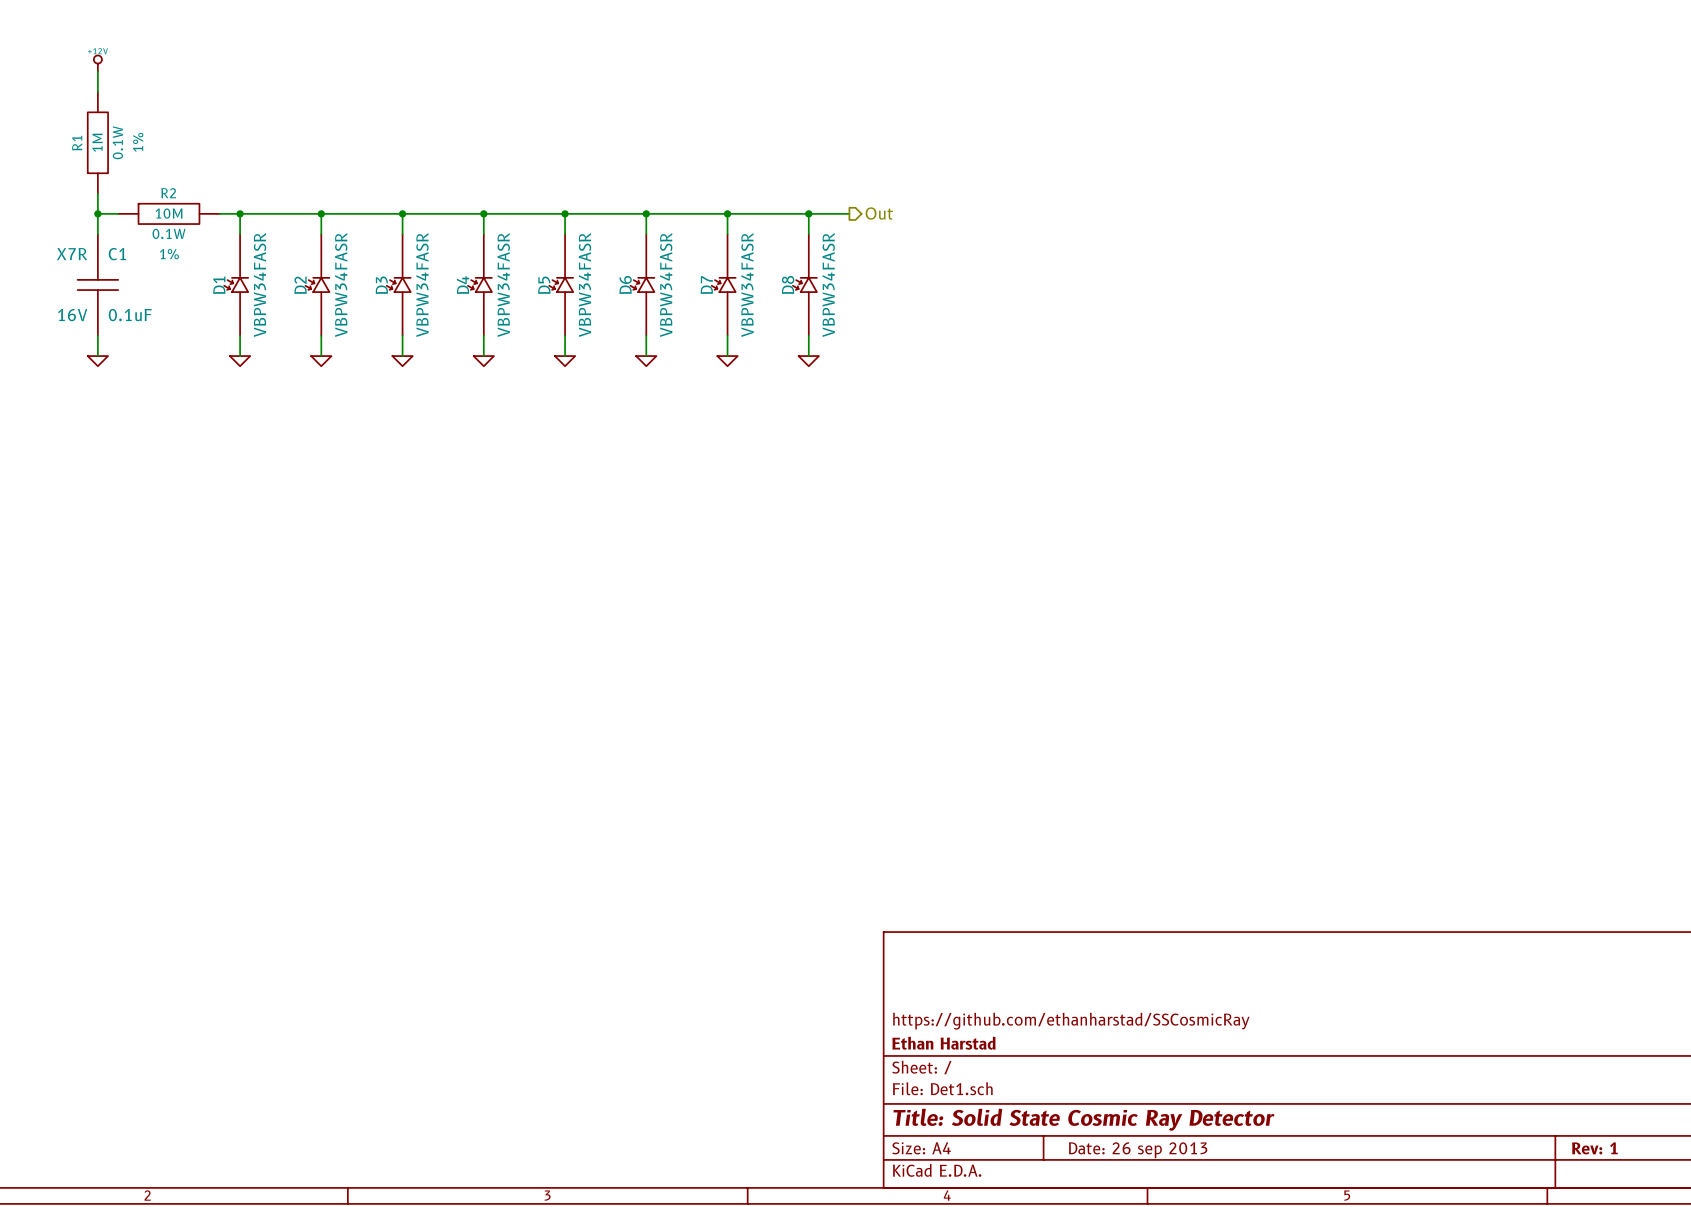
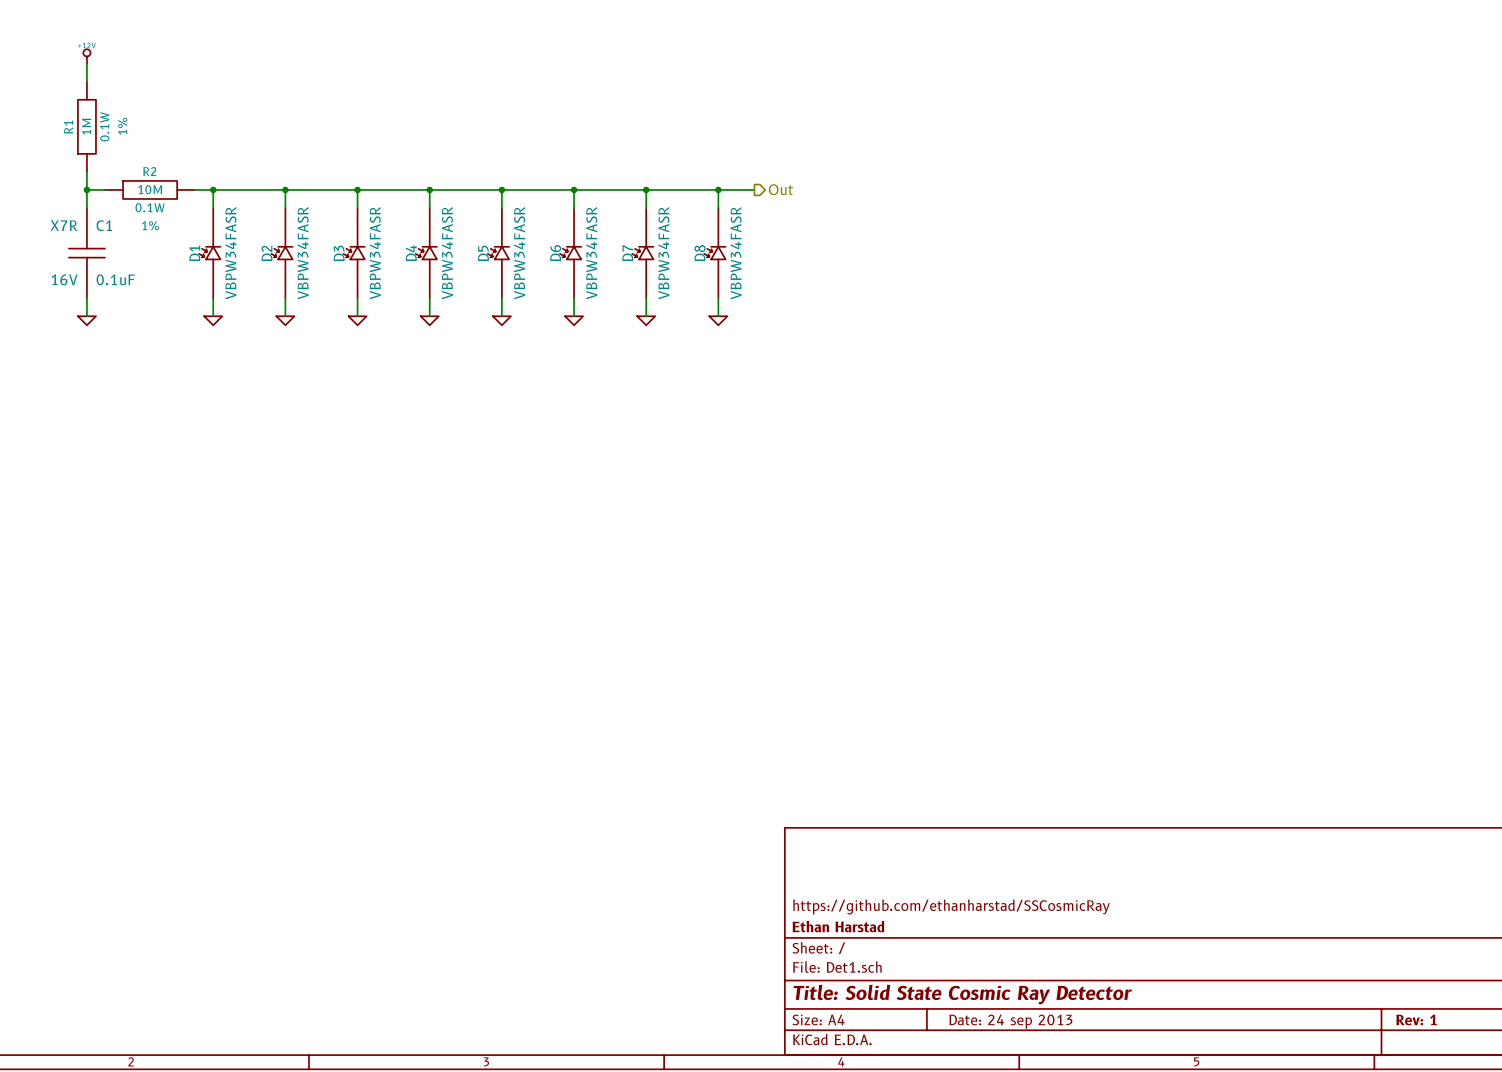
title block: Date: 26 sep 2013 (1138, 1150) -> Date: 24 sep 2013 (1010, 1021)

